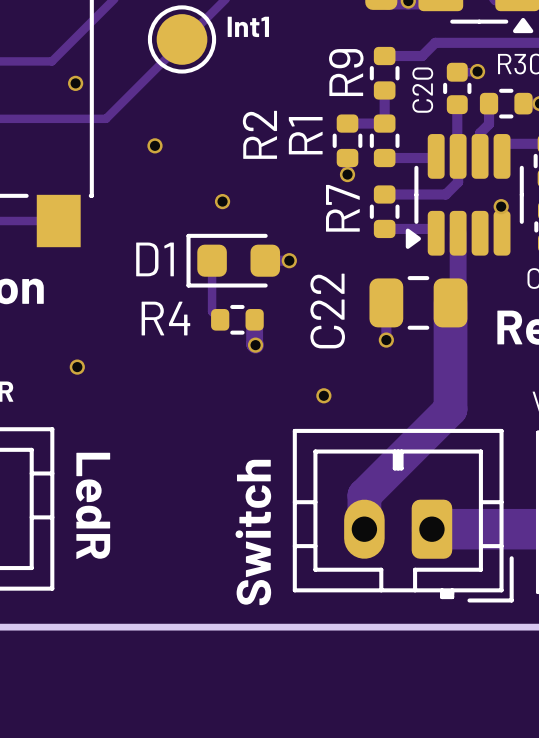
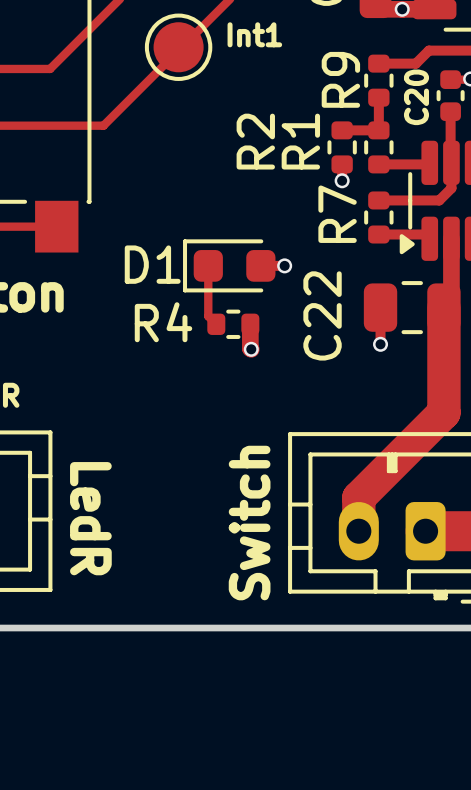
via: (75, 83) -> none
via: (154, 145) -> none
via: (222, 201) -> none
via: (77, 367) -> none
via: (323, 395) -> none

